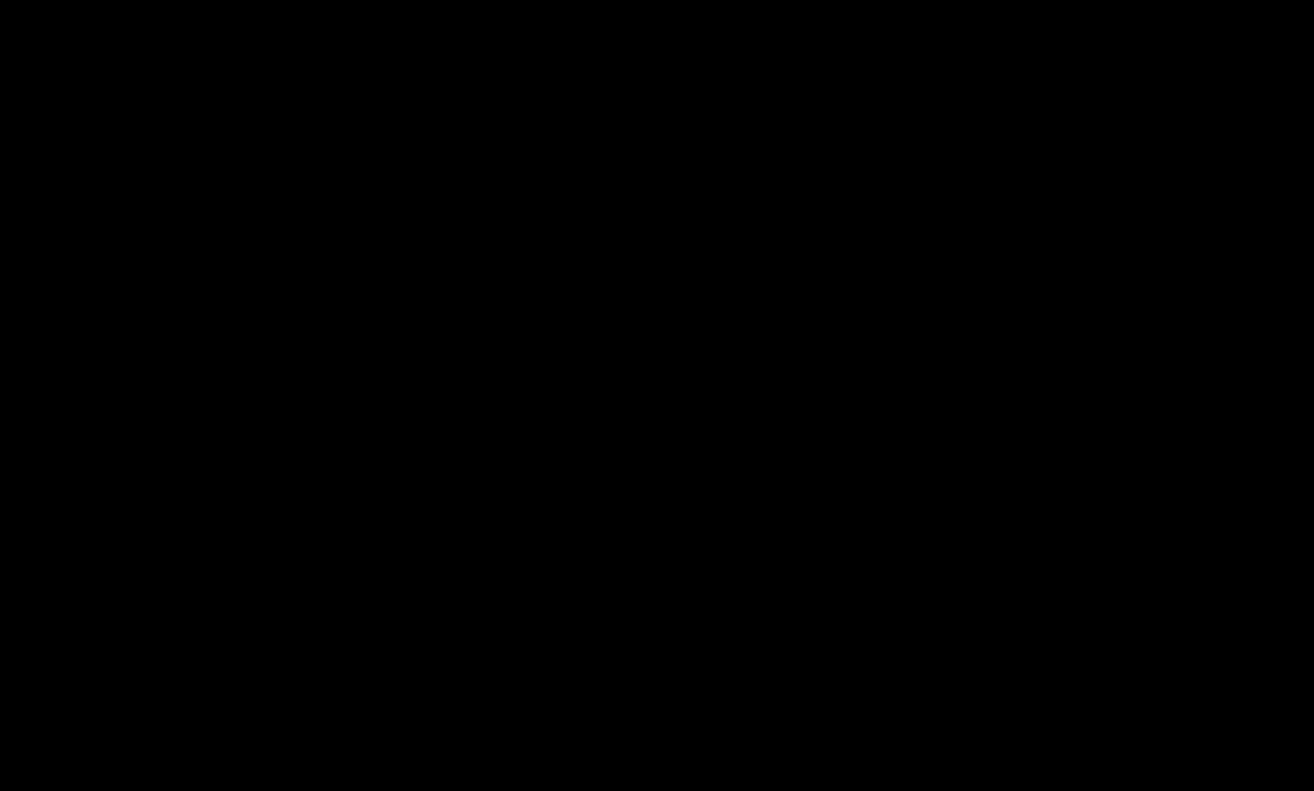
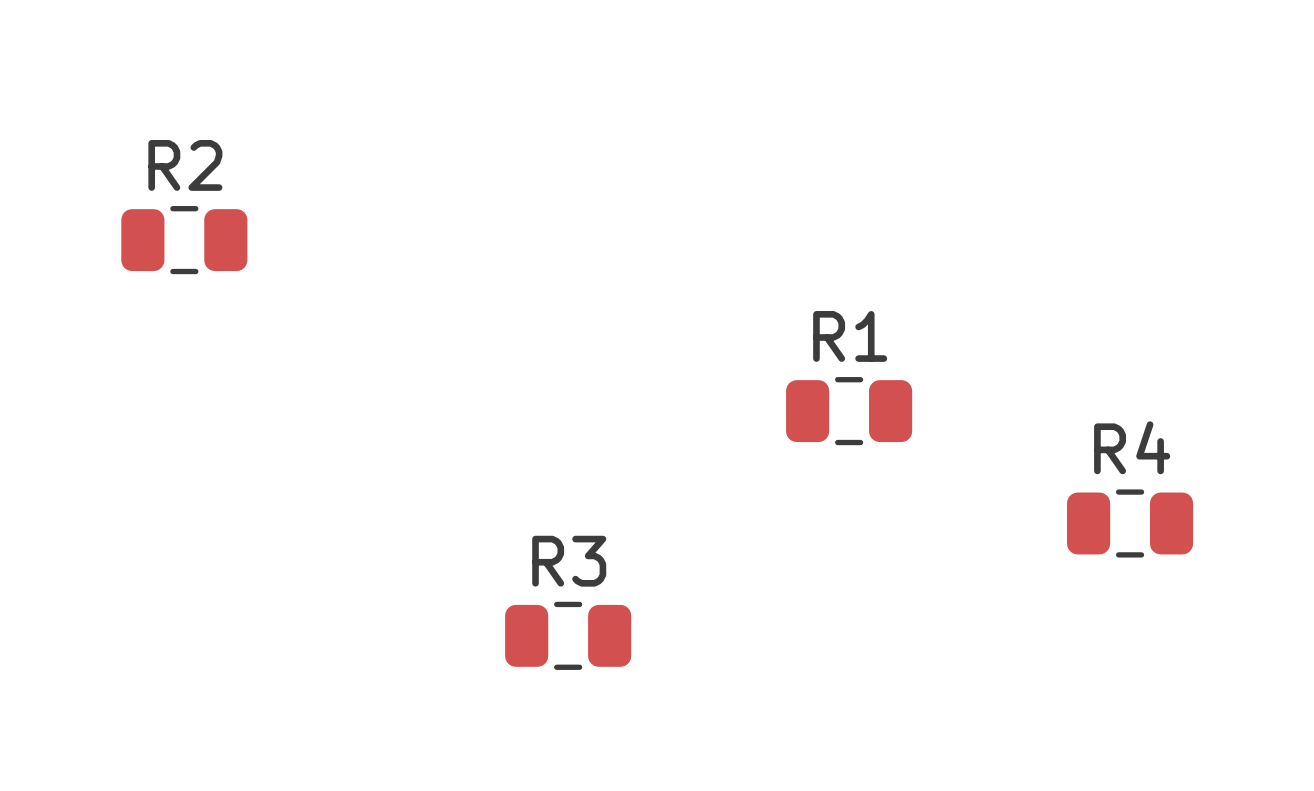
R2: none -> (184, 240)
R1: none -> (849, 411)
R4: none -> (1130, 523)
R3: none -> (568, 635)

